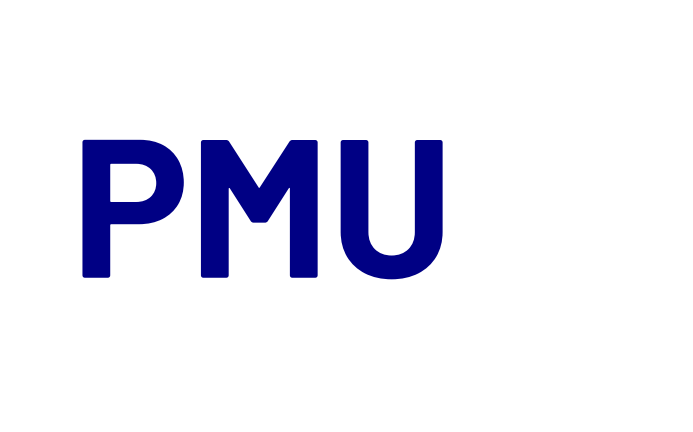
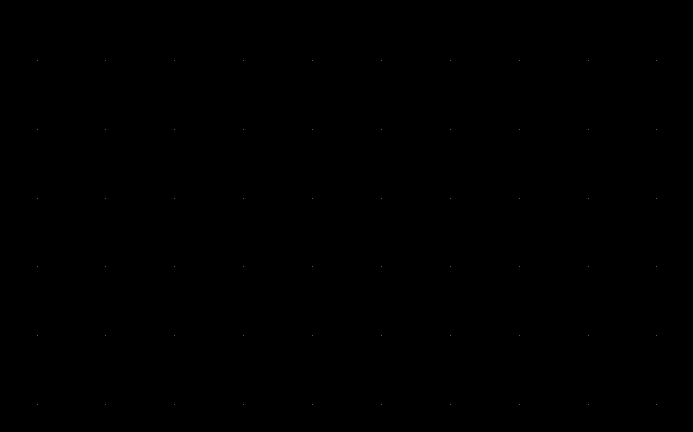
text: PMU (262, 209) -> none

